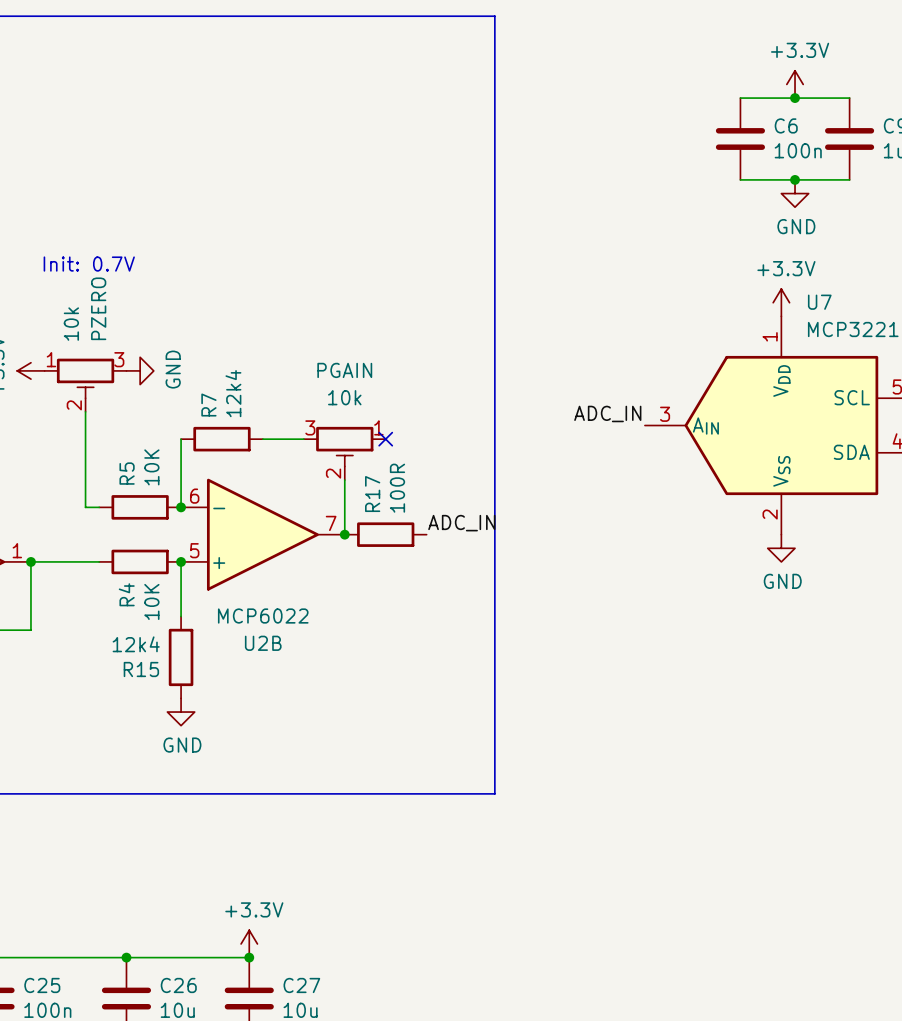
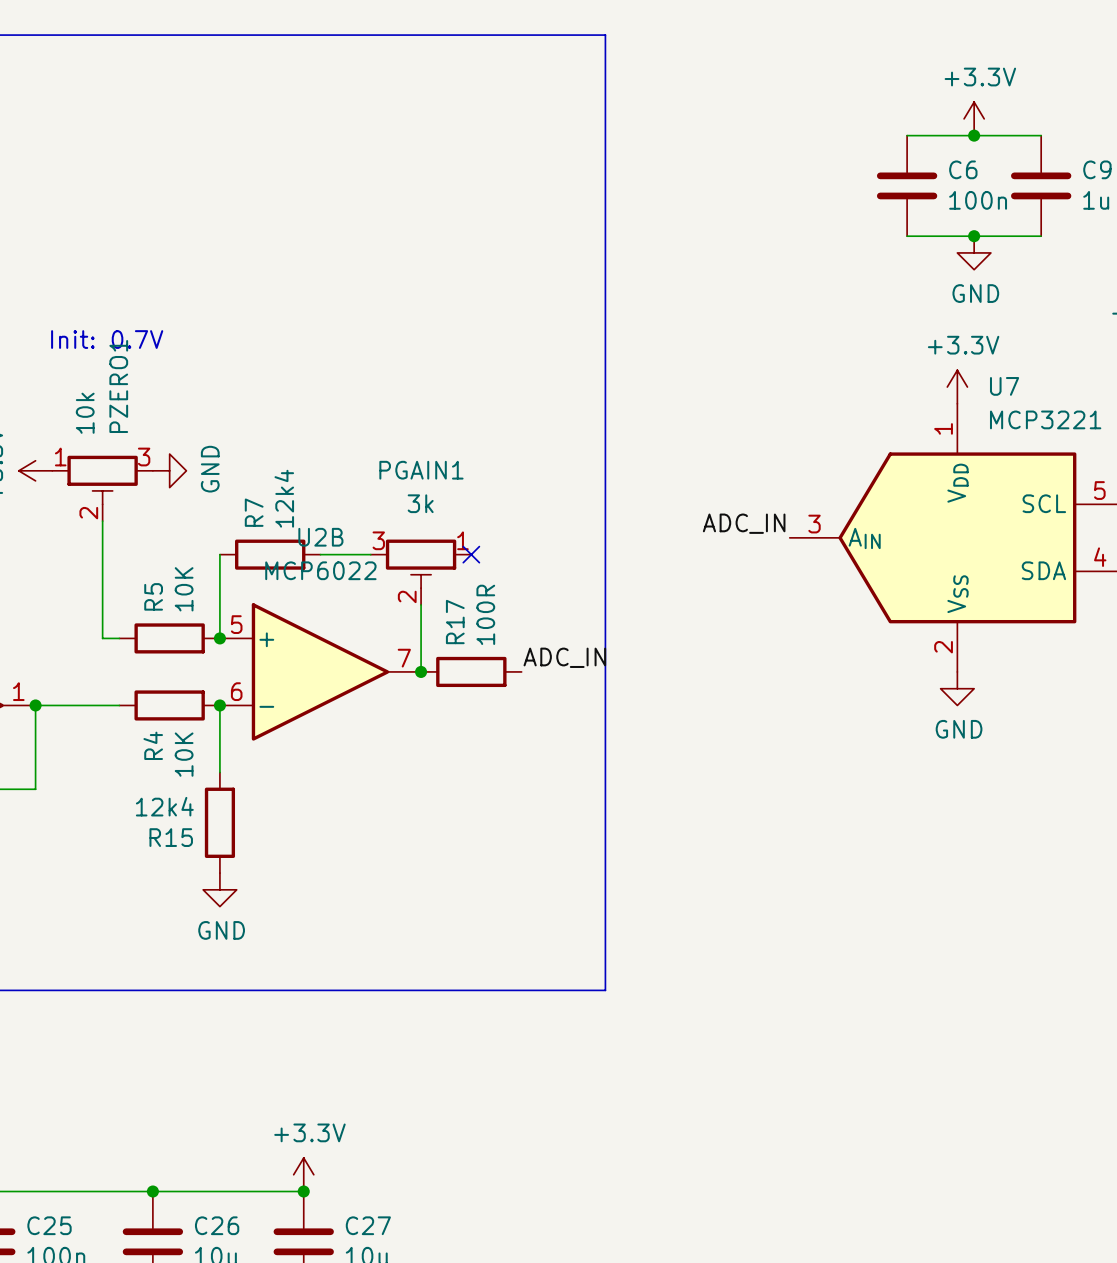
PZERO name: PZERO (98, 308) -> PZERO1 (118, 386)
PGAIN name: PGAIN (344, 370) -> PGAIN1 (421, 470)
PGAIN value: 10k (344, 397) -> 3k (420, 503)
U2B flip: as is (262, 534) -> up-down (320, 671)

